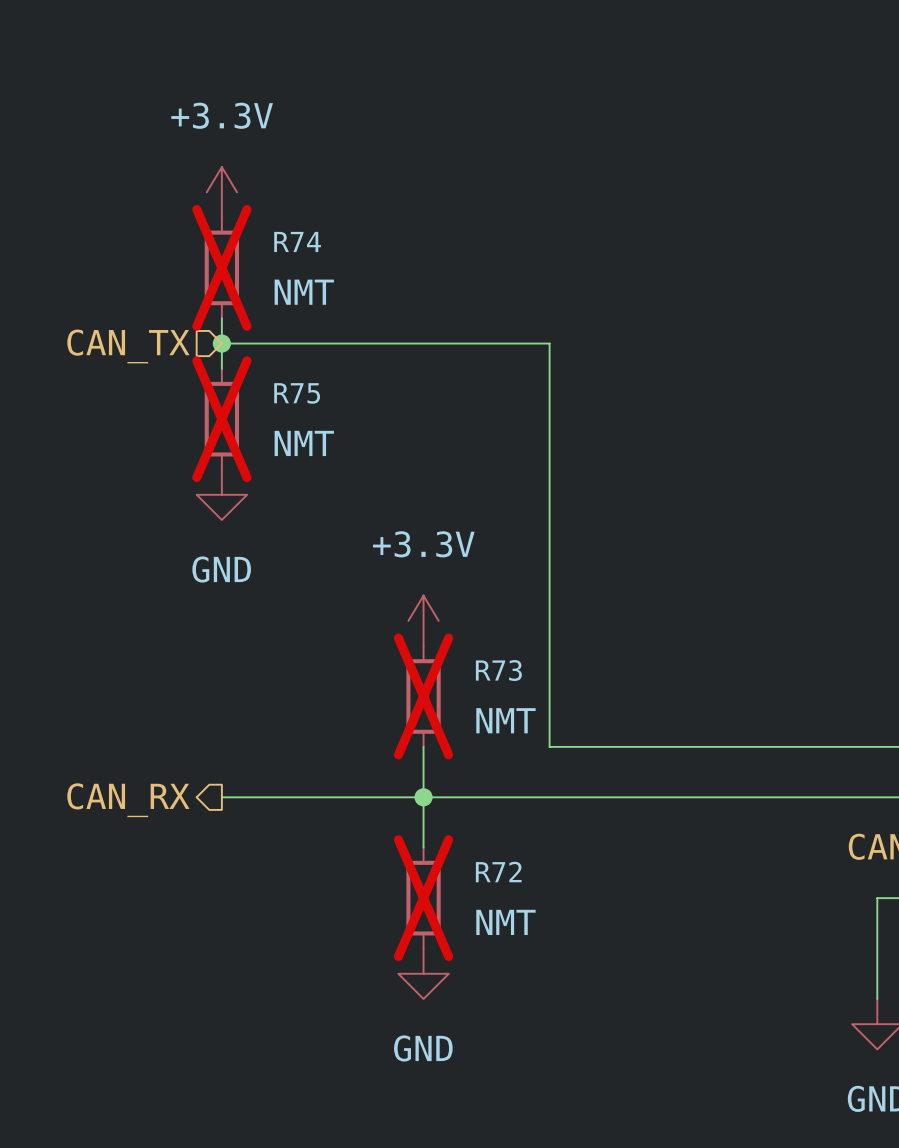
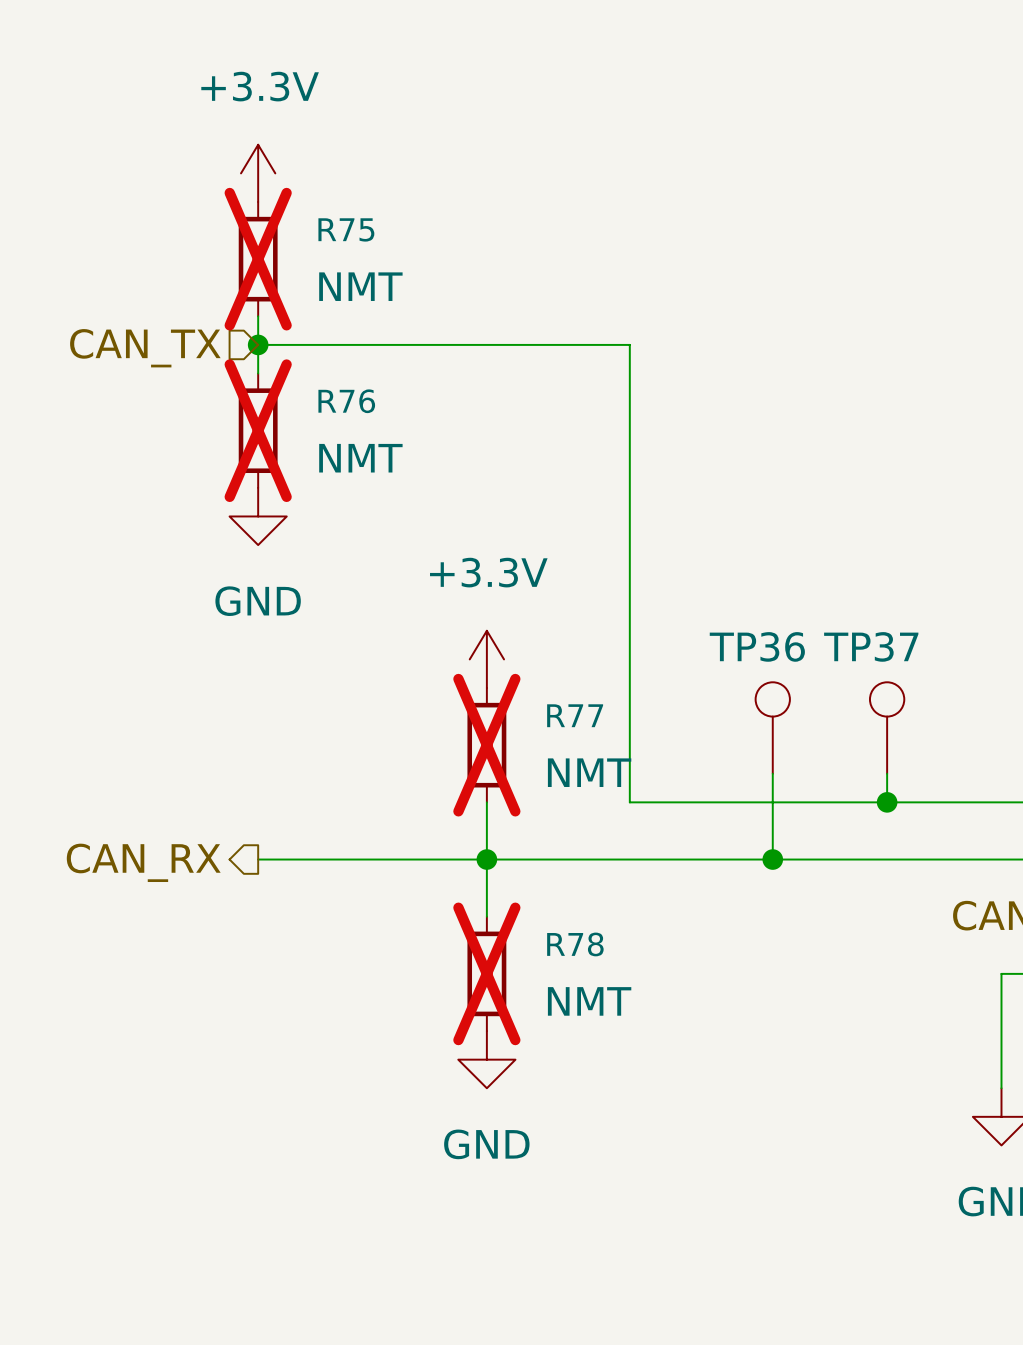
R74 name: R74 (297, 241) -> R75 (346, 229)
R75 name: R75 (297, 393) -> R76 (346, 401)
R73 name: R73 (498, 670) -> R77 (575, 715)
TP36: none -> (772, 728)
TP37: none -> (887, 728)
wire: none -> (772, 773) (772, 859)
wire: none -> (887, 773) (887, 802)
junction: none -> (887, 802)
junction: none -> (772, 859)
R72 name: R72 (498, 872) -> R78 (575, 944)

